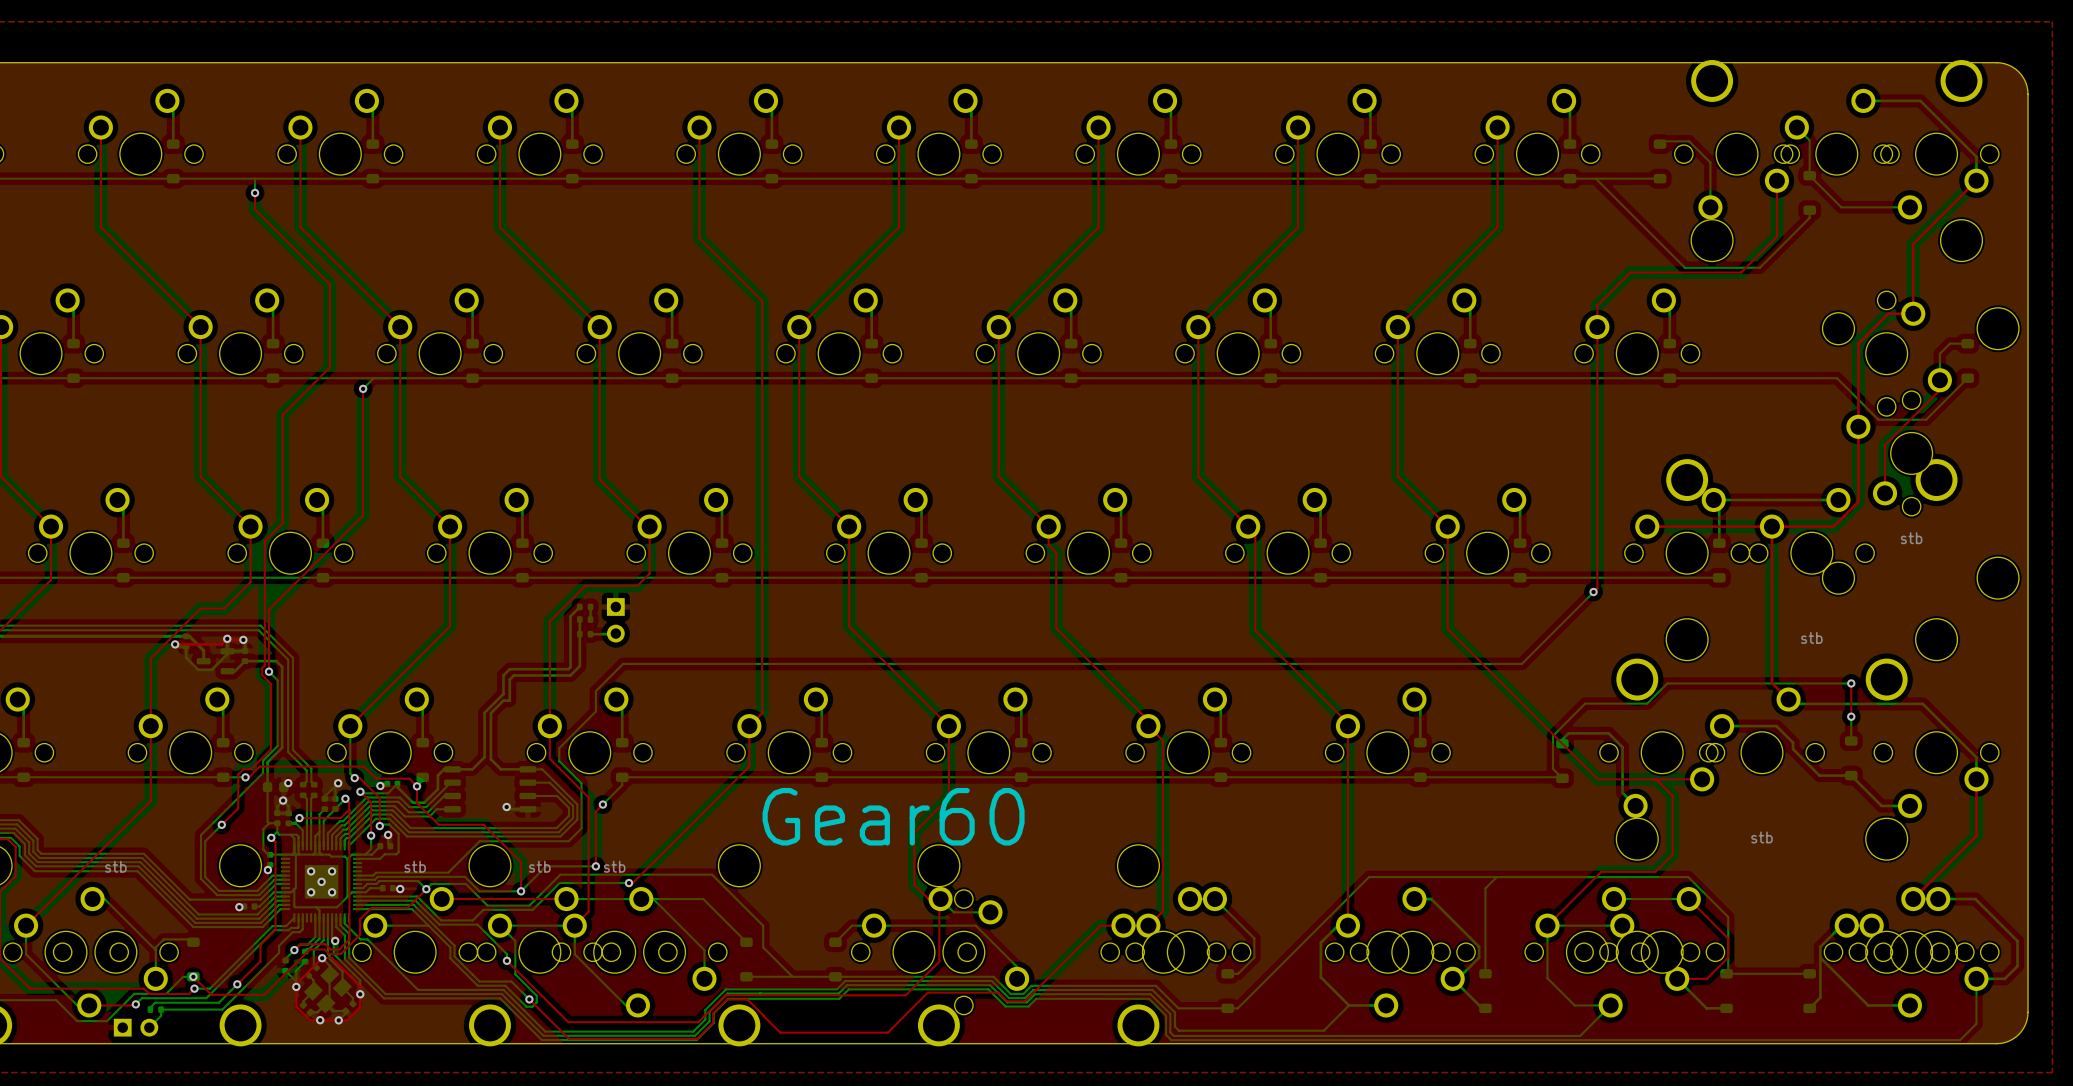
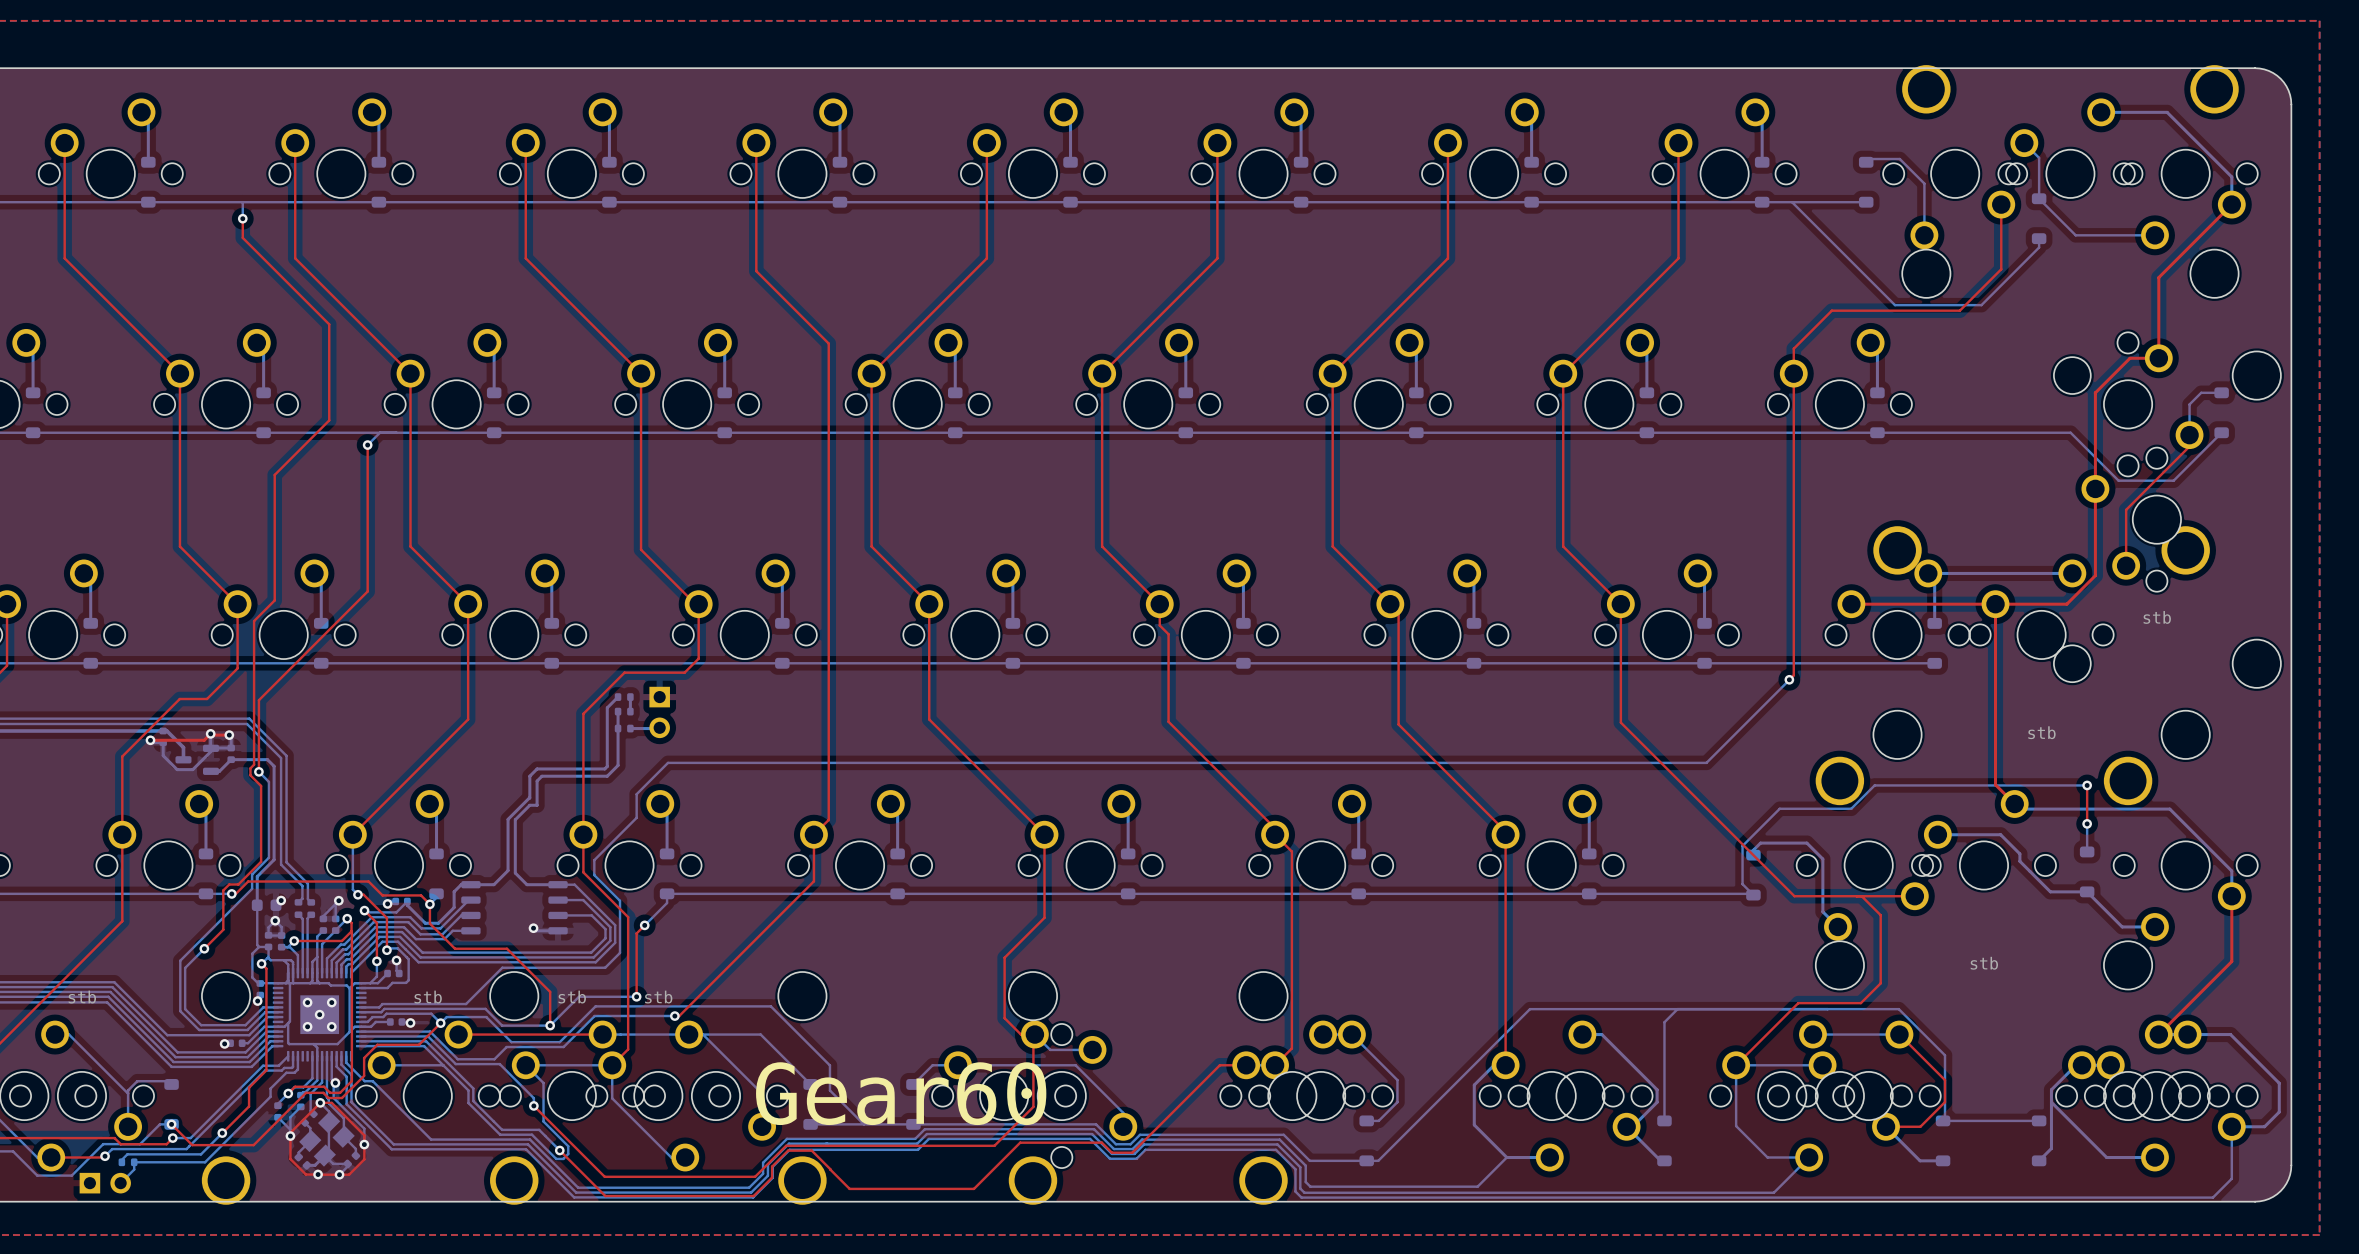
text position: Gear60 (893, 816) -> Gear60 (901, 1093)

